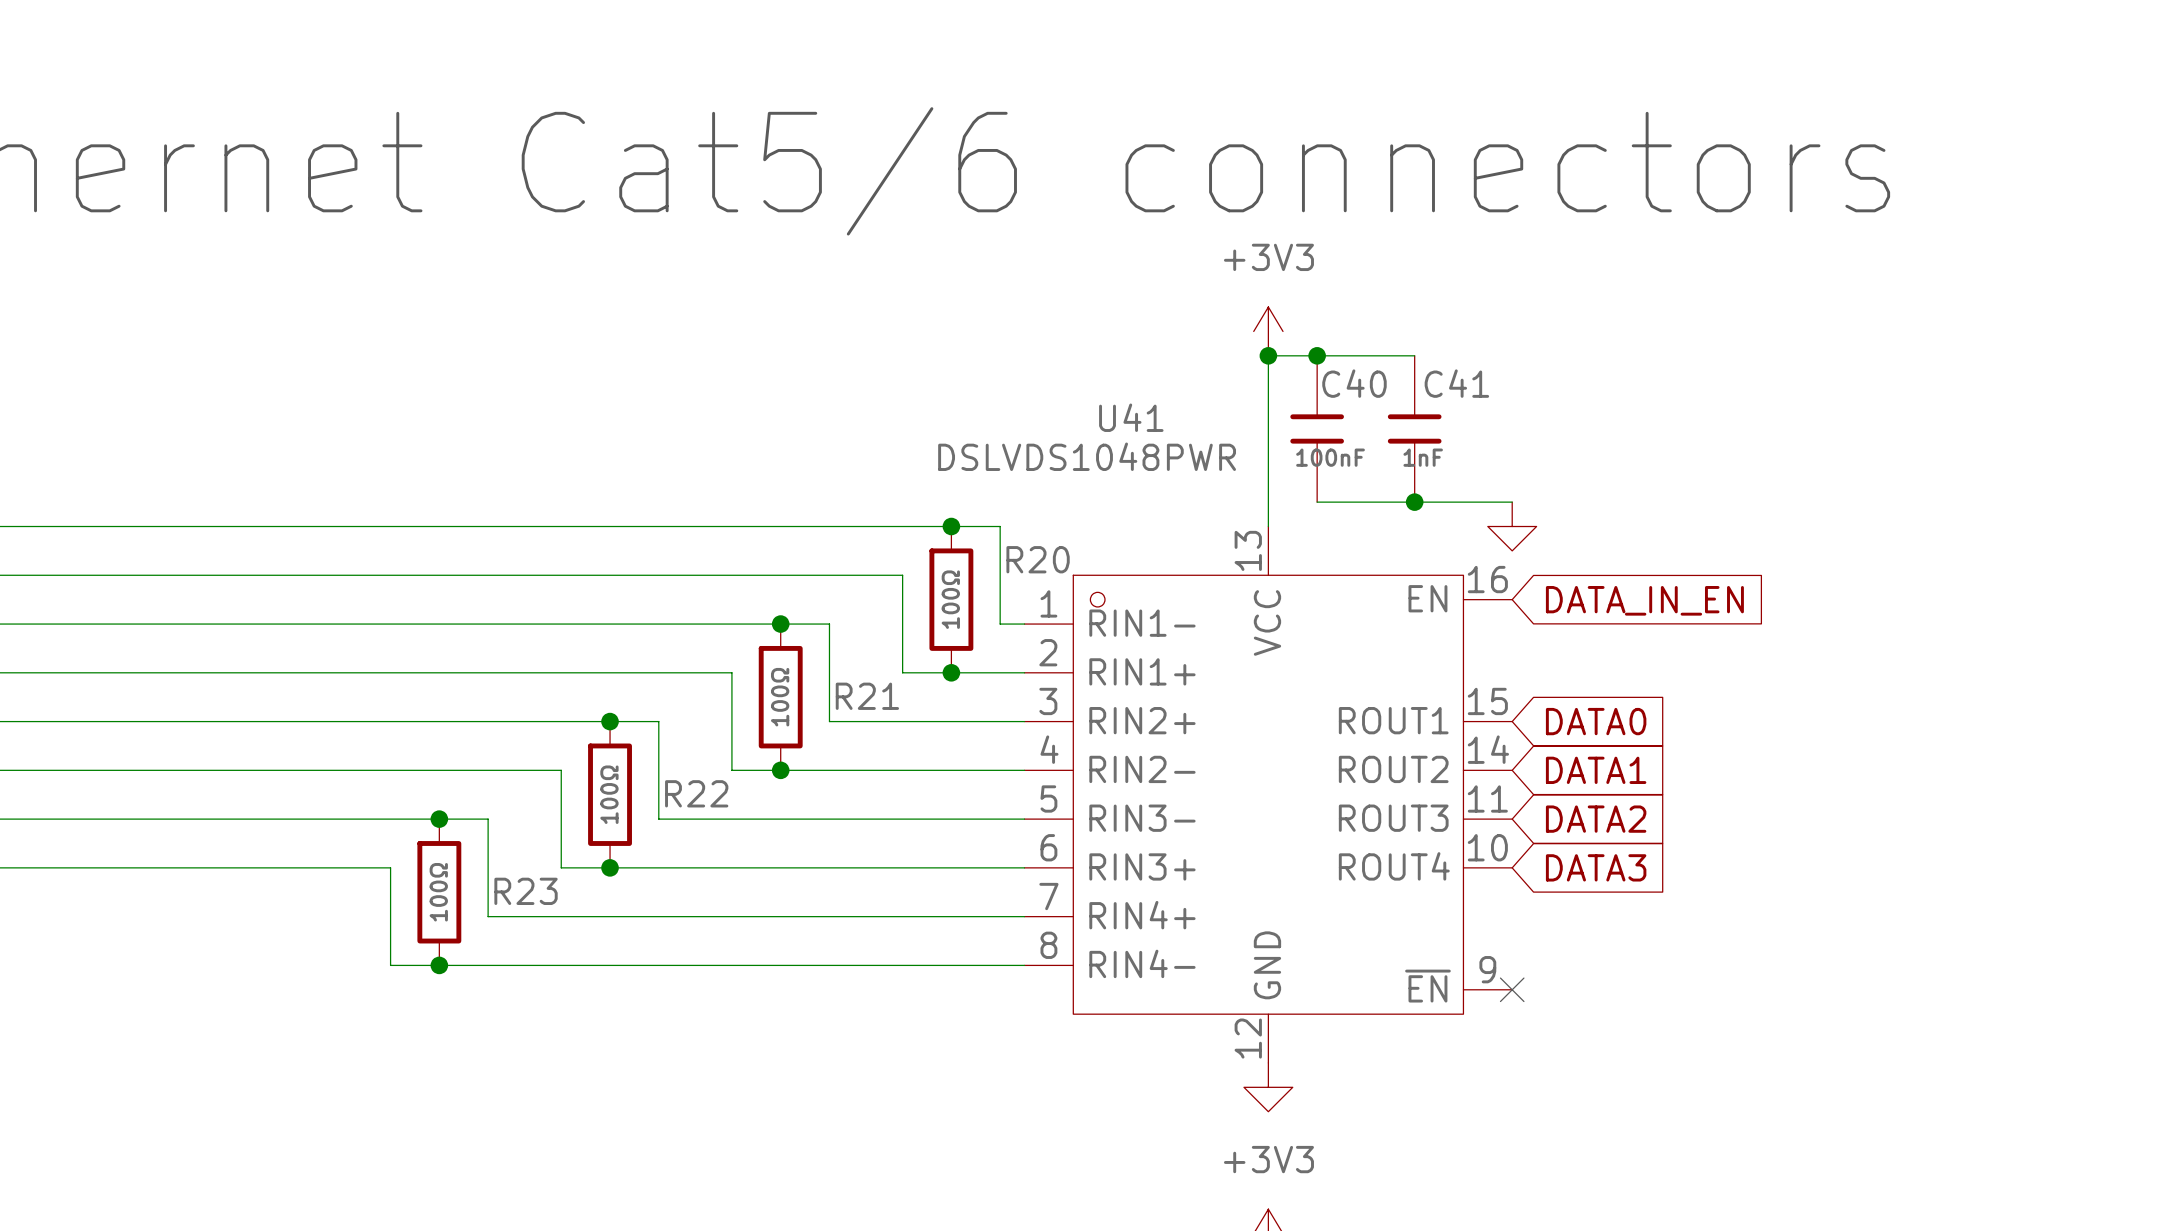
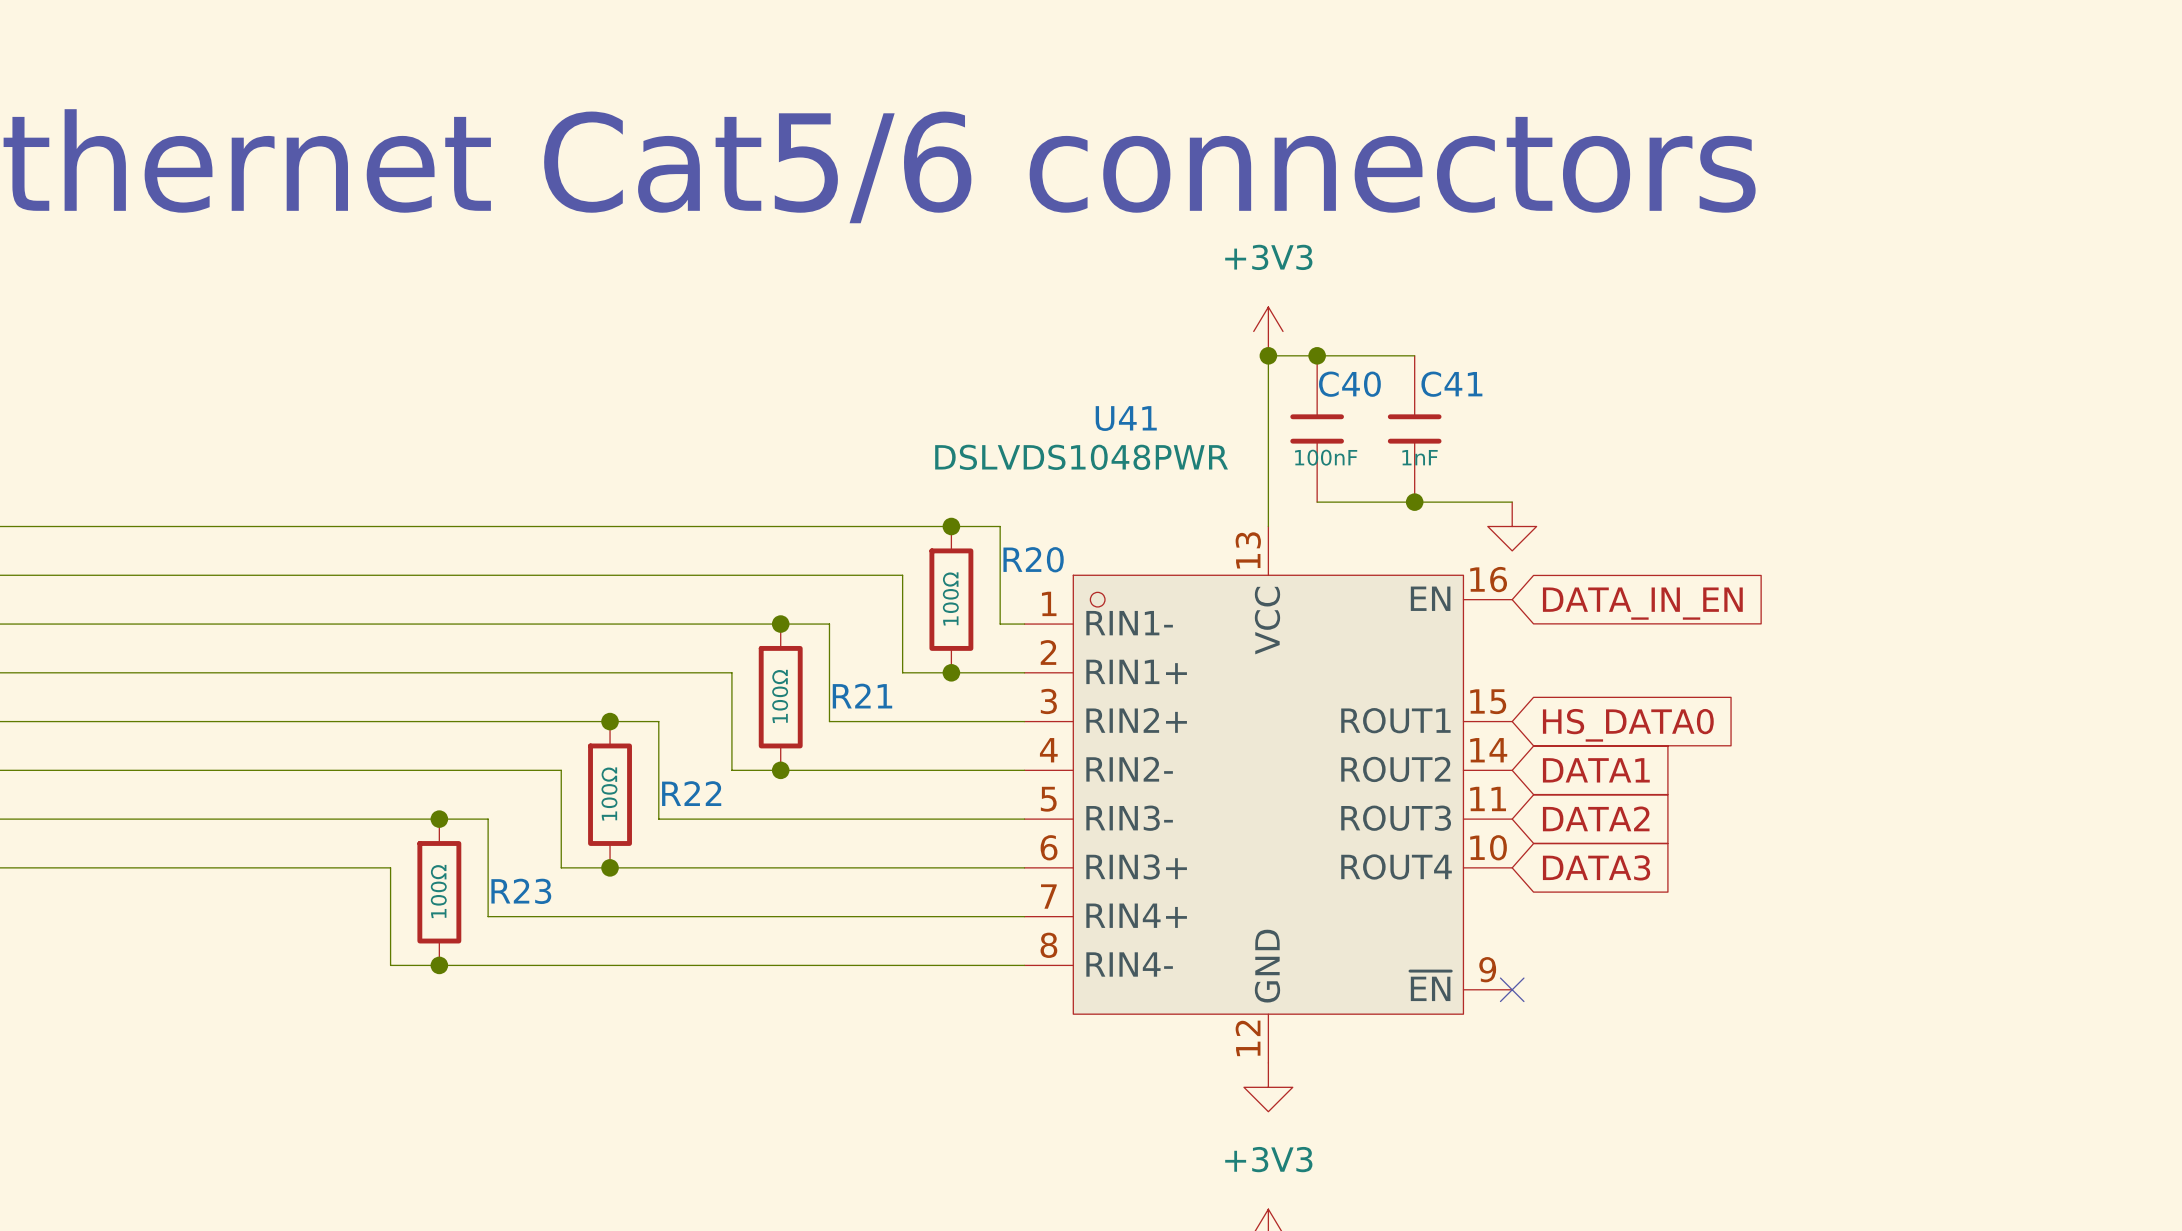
global label: DATA0 (1596, 721) -> HS_DATA0 (1628, 725)

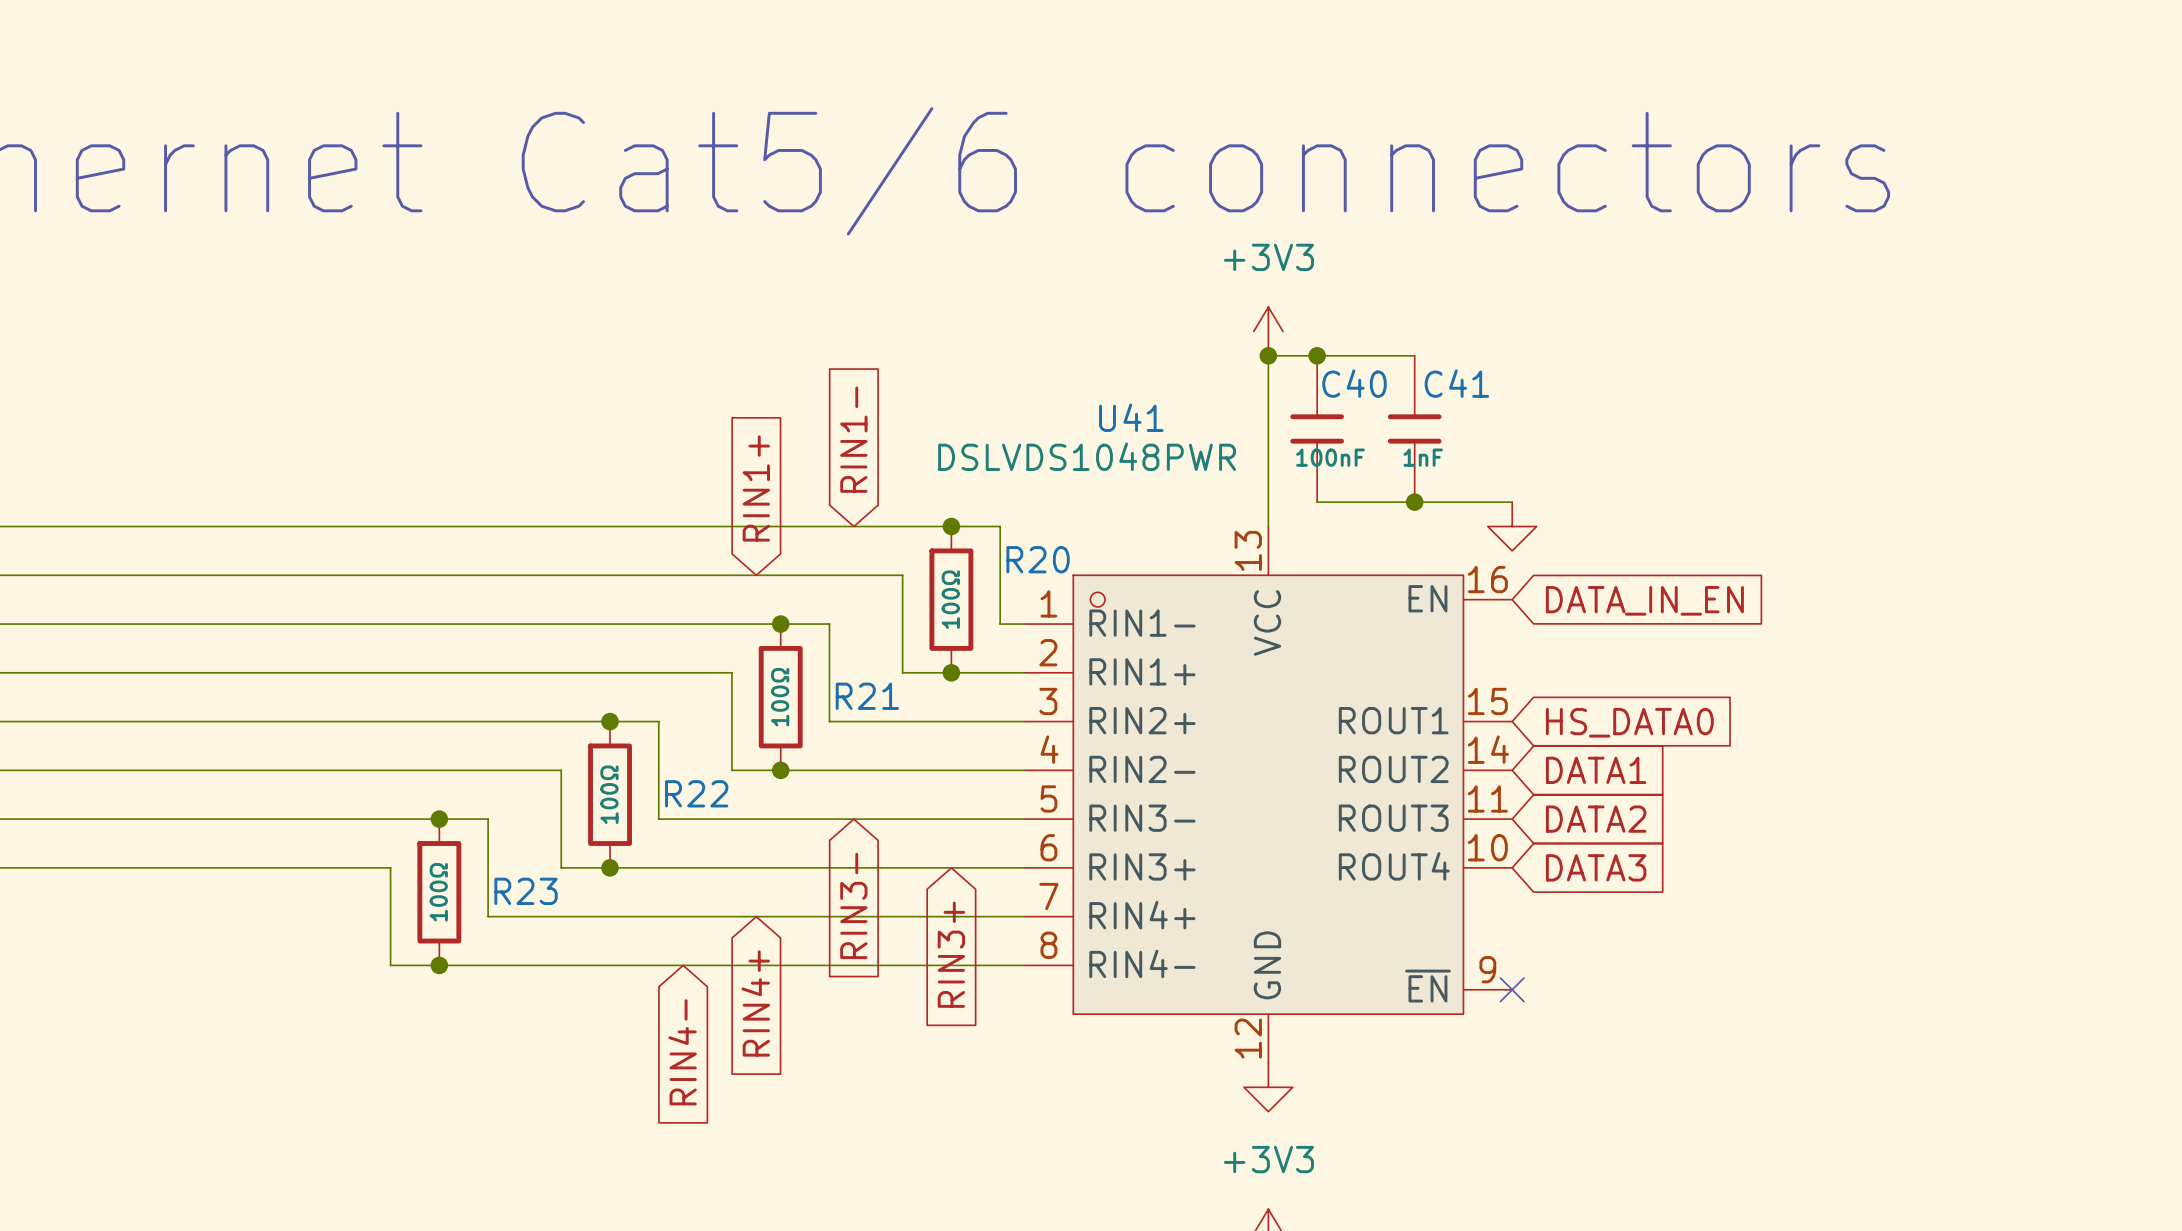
global label: none -> RIN1- (853, 439)
global label: none -> RIN1+ (756, 488)
global label: none -> RIN3- (853, 905)
global label: none -> RIN3+ (951, 954)
global label: none -> RIN4+ (755, 1003)
global label: none -> RIN4- (682, 1052)

